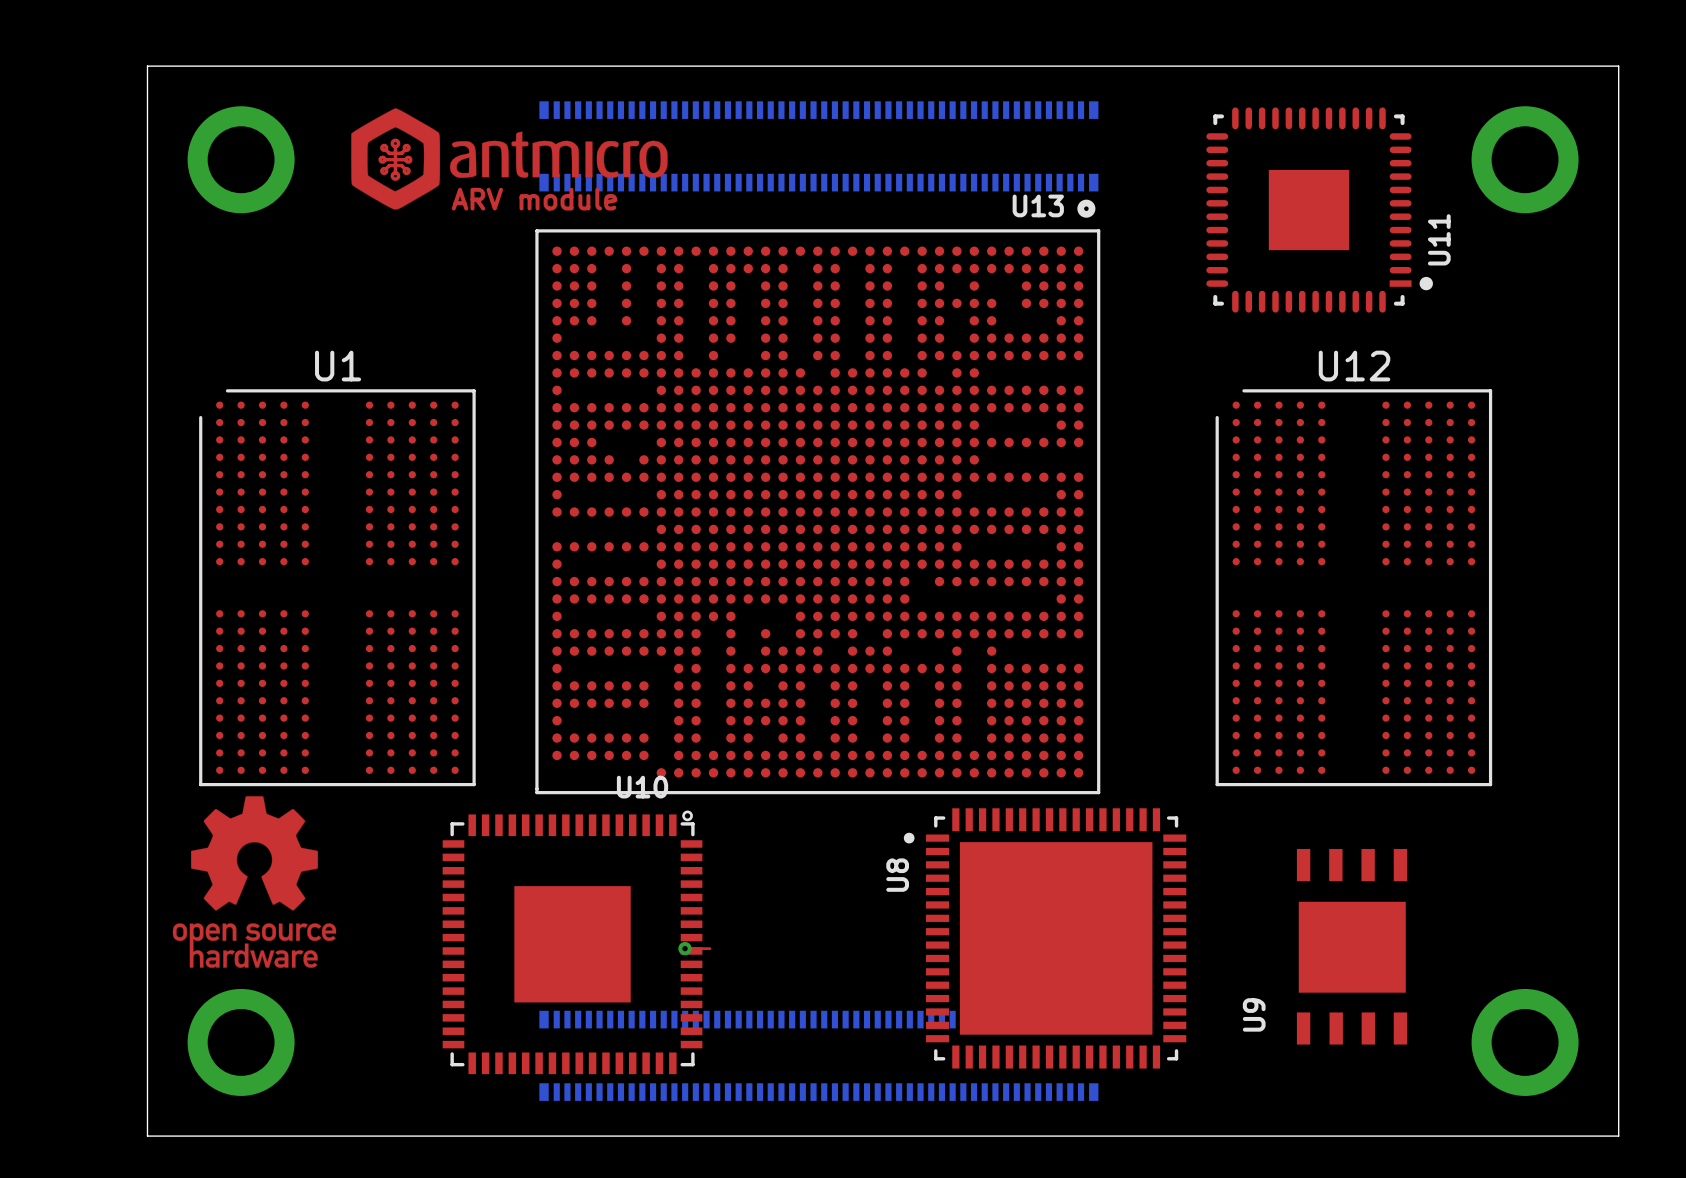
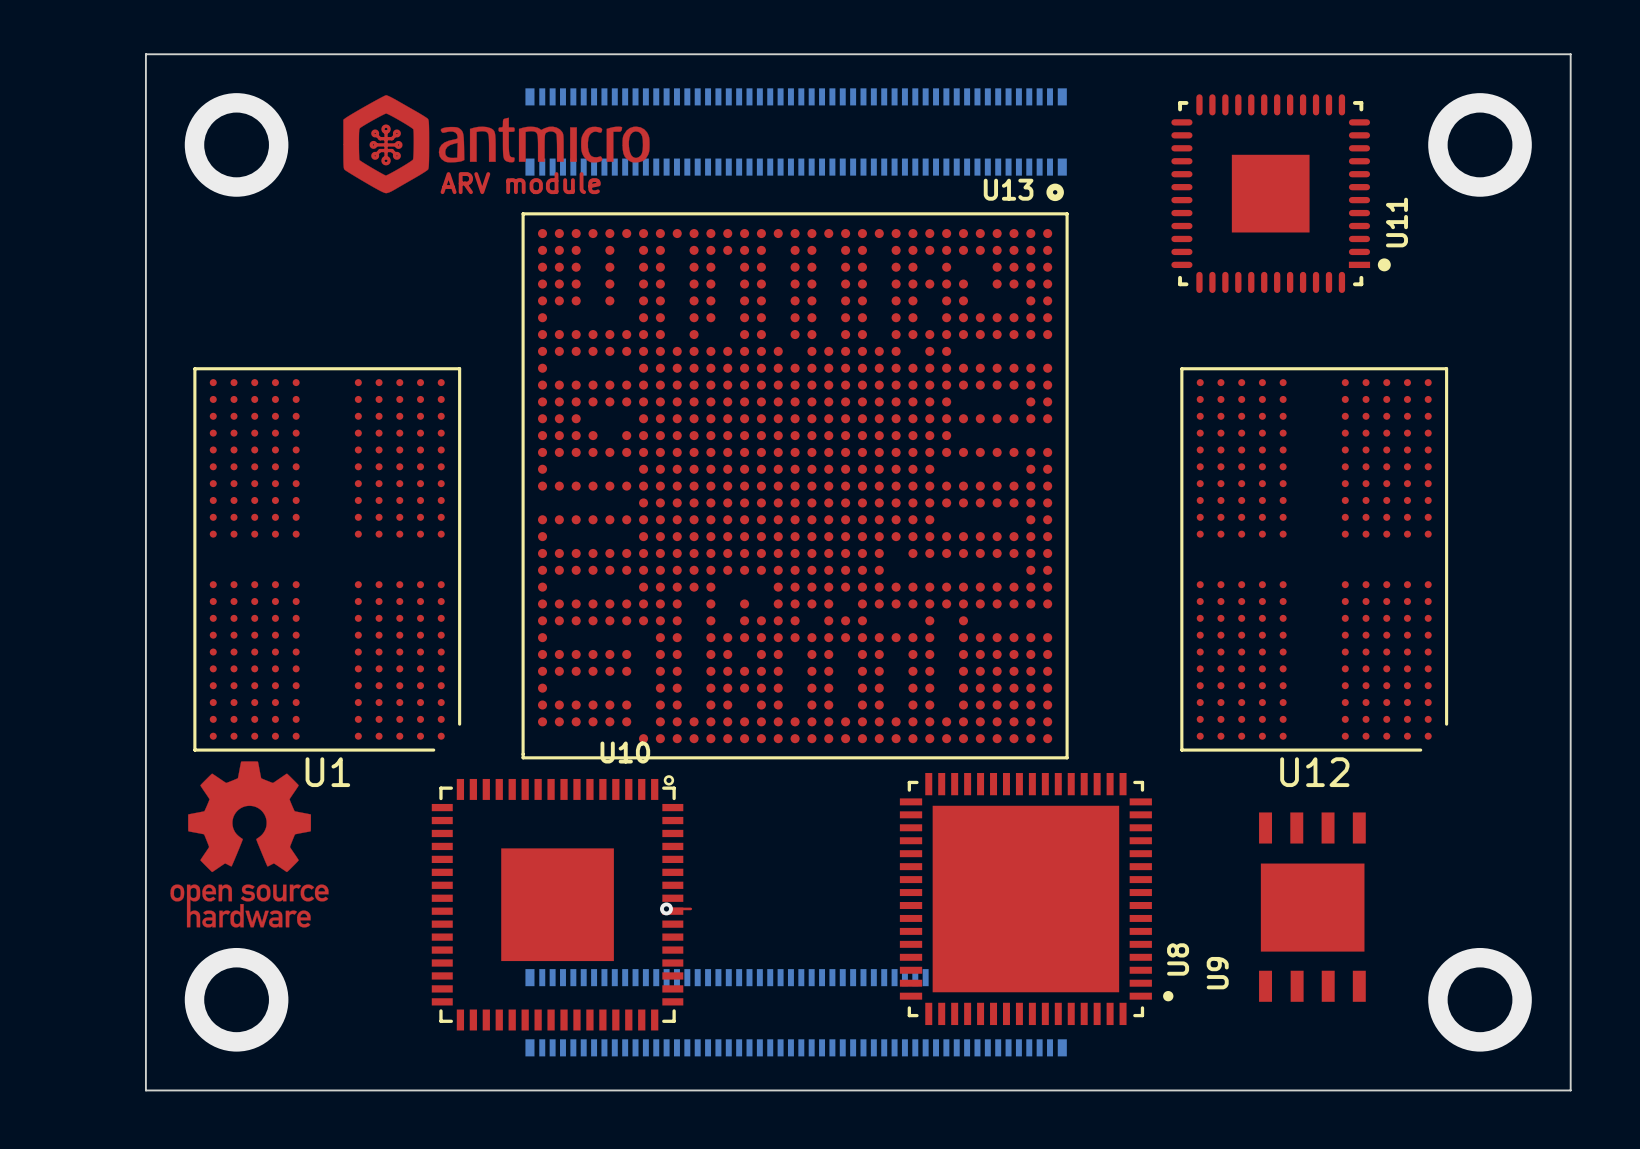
U1 rotation: 0° (337, 587) -> 180° (327, 559)
U12 rotation: 0° (1353, 587) -> 180° (1314, 559)
U8 rotation: 0° (1045, 938) -> 180° (1036, 899)

